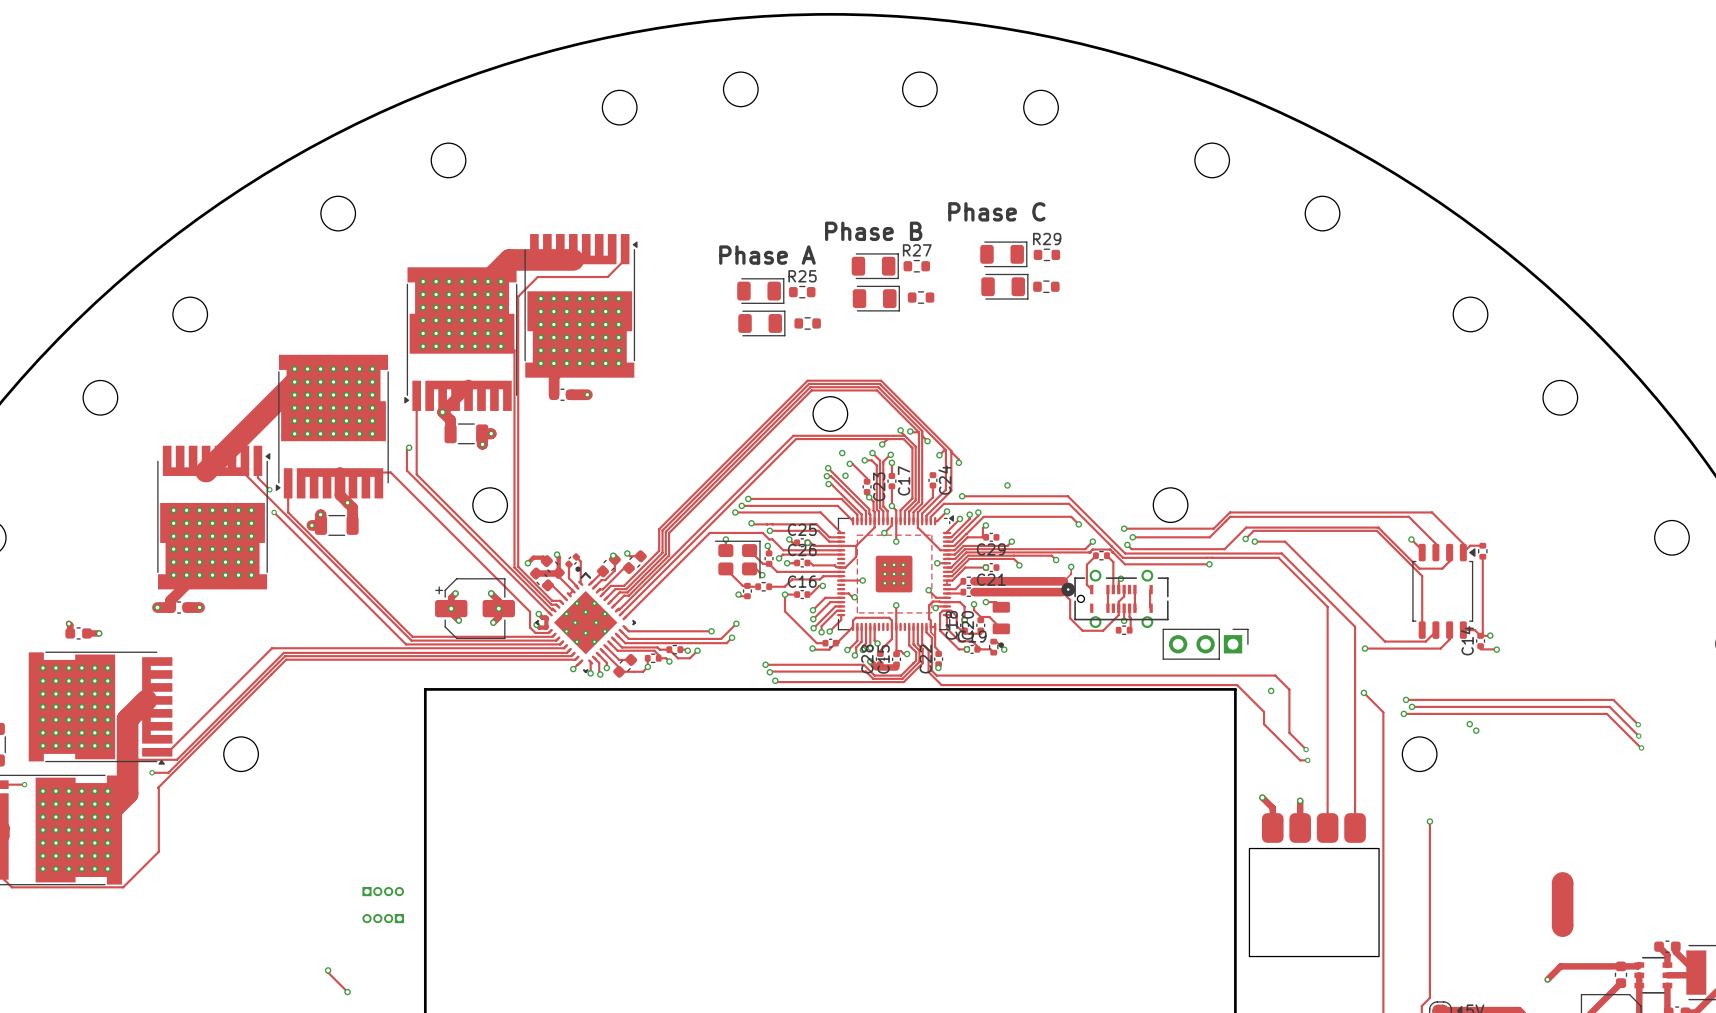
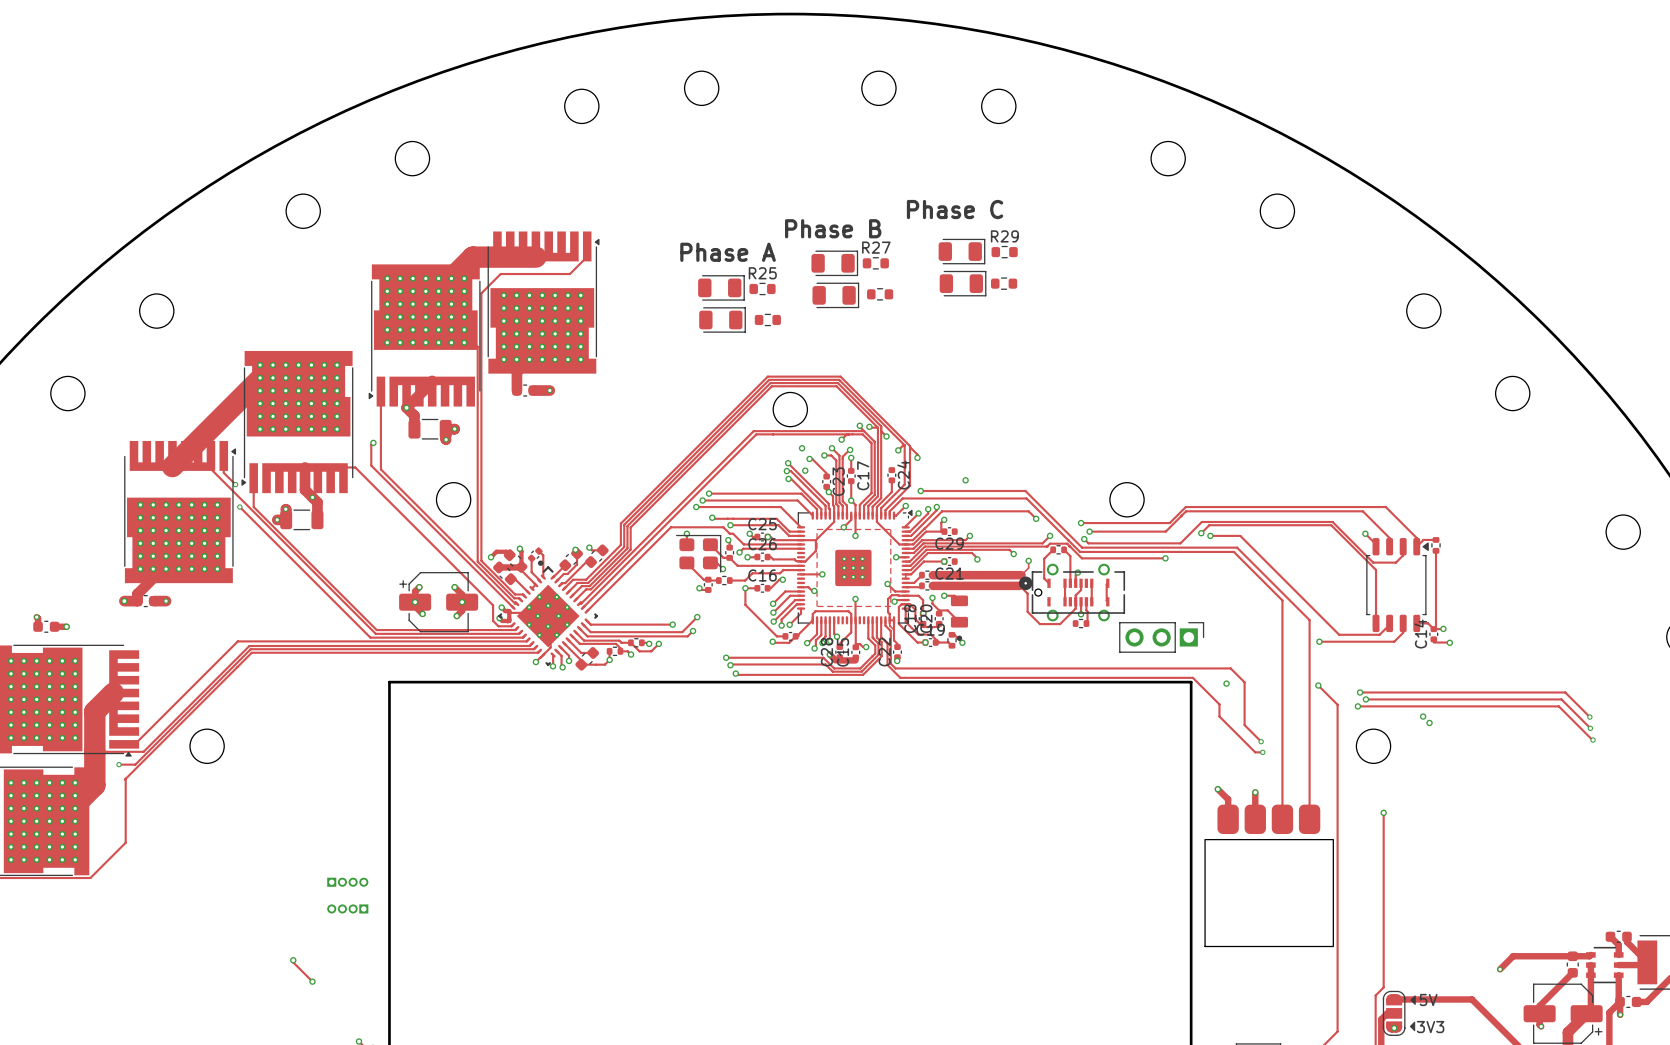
track: none -> (510, 612) (526, 612)
track: none -> (550, 632) (550, 647) (543, 654)
part: (1562, 904) -> none

